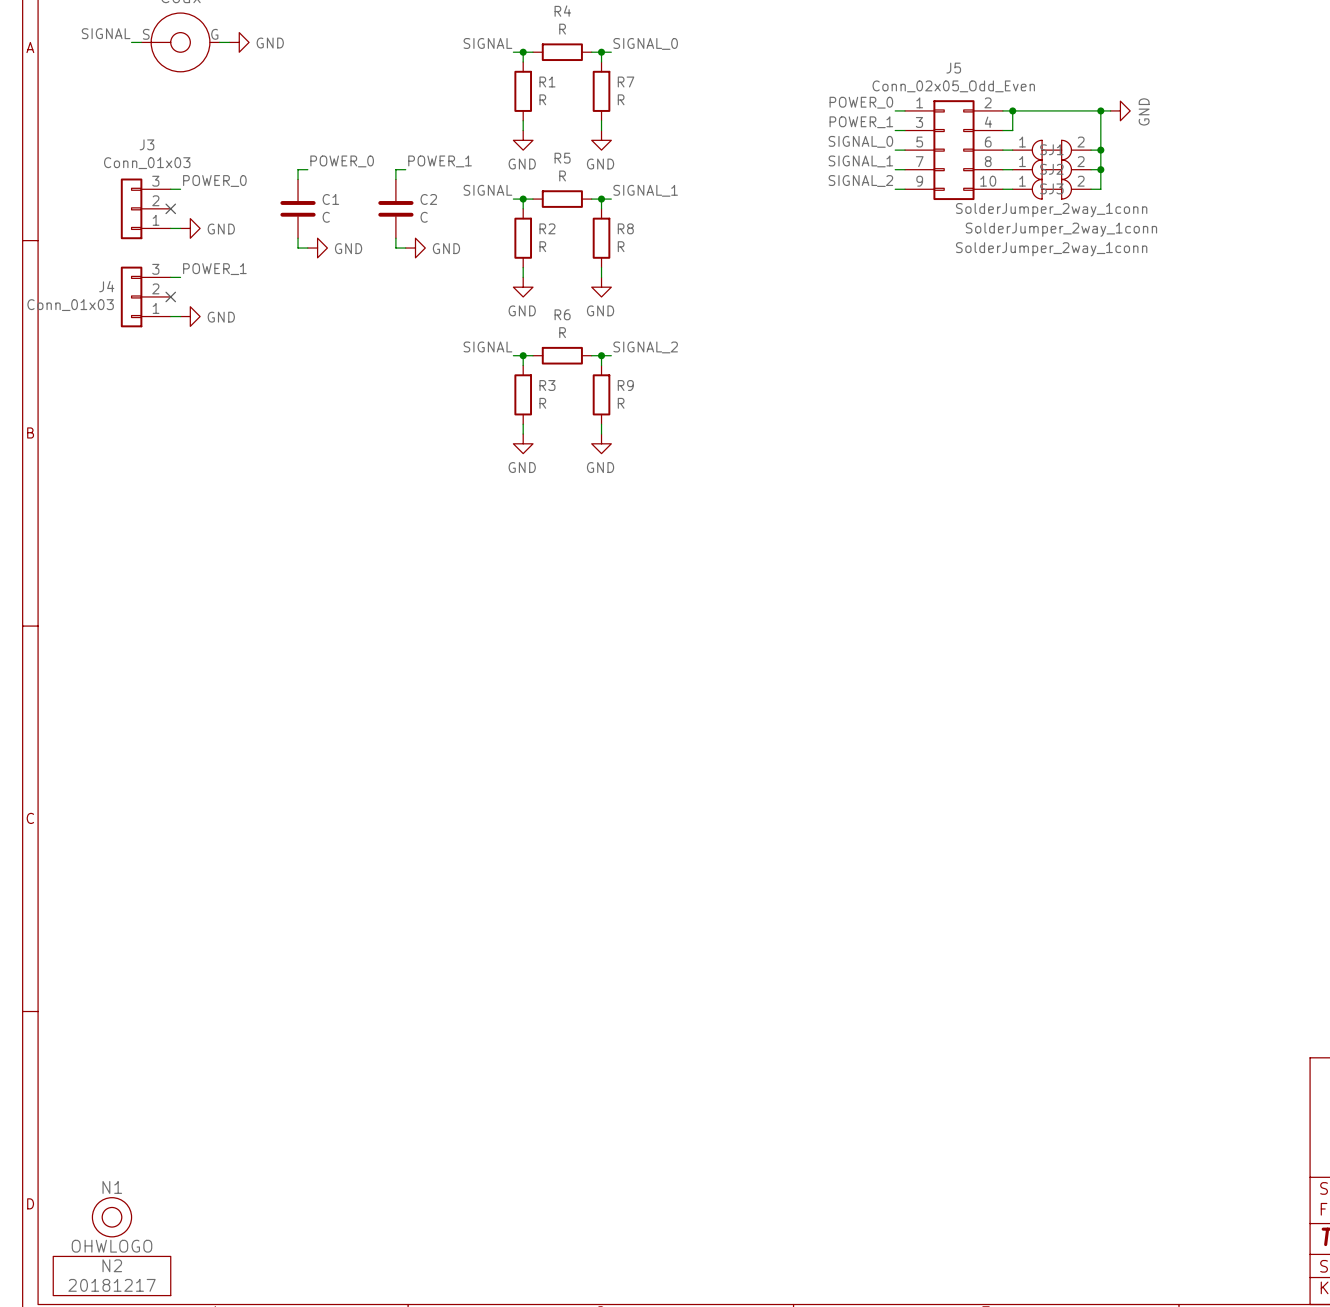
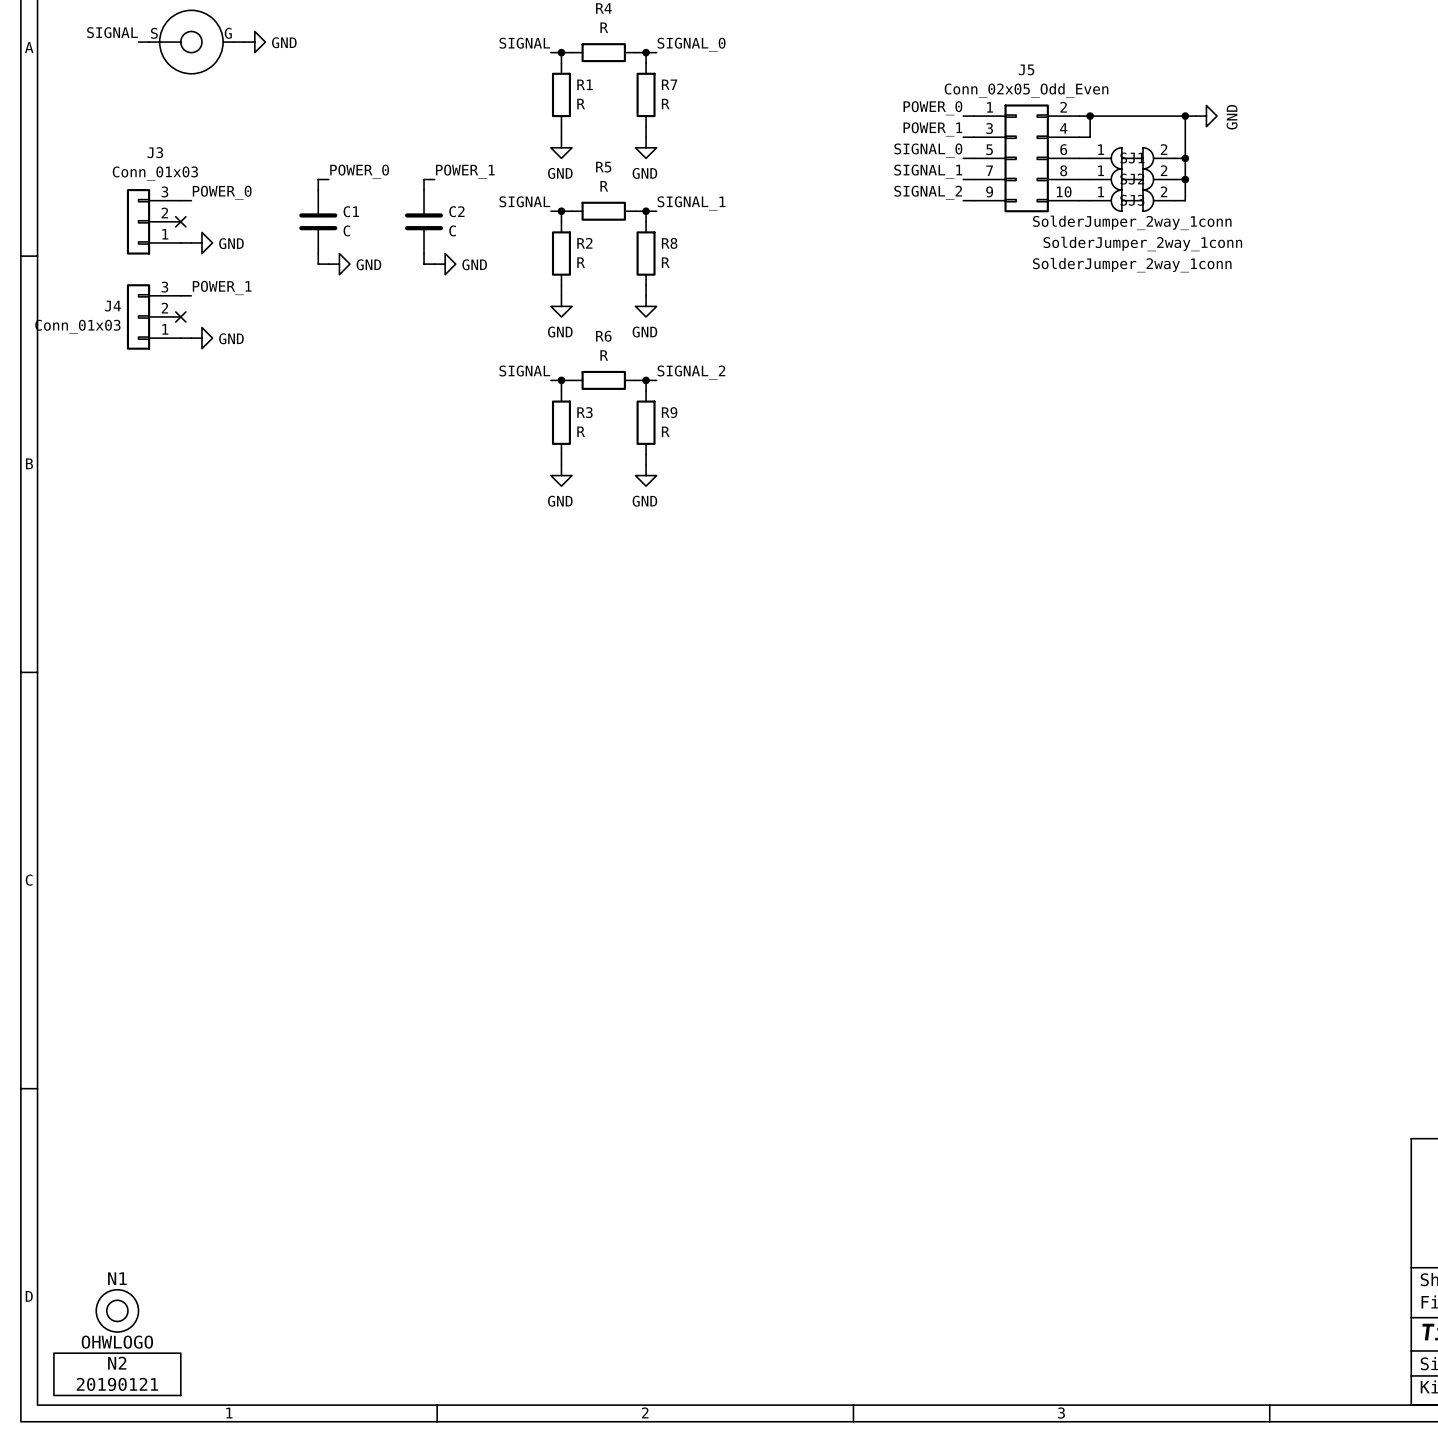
N2 value: 20181217 (111, 1285) -> 20190121 (117, 1384)

